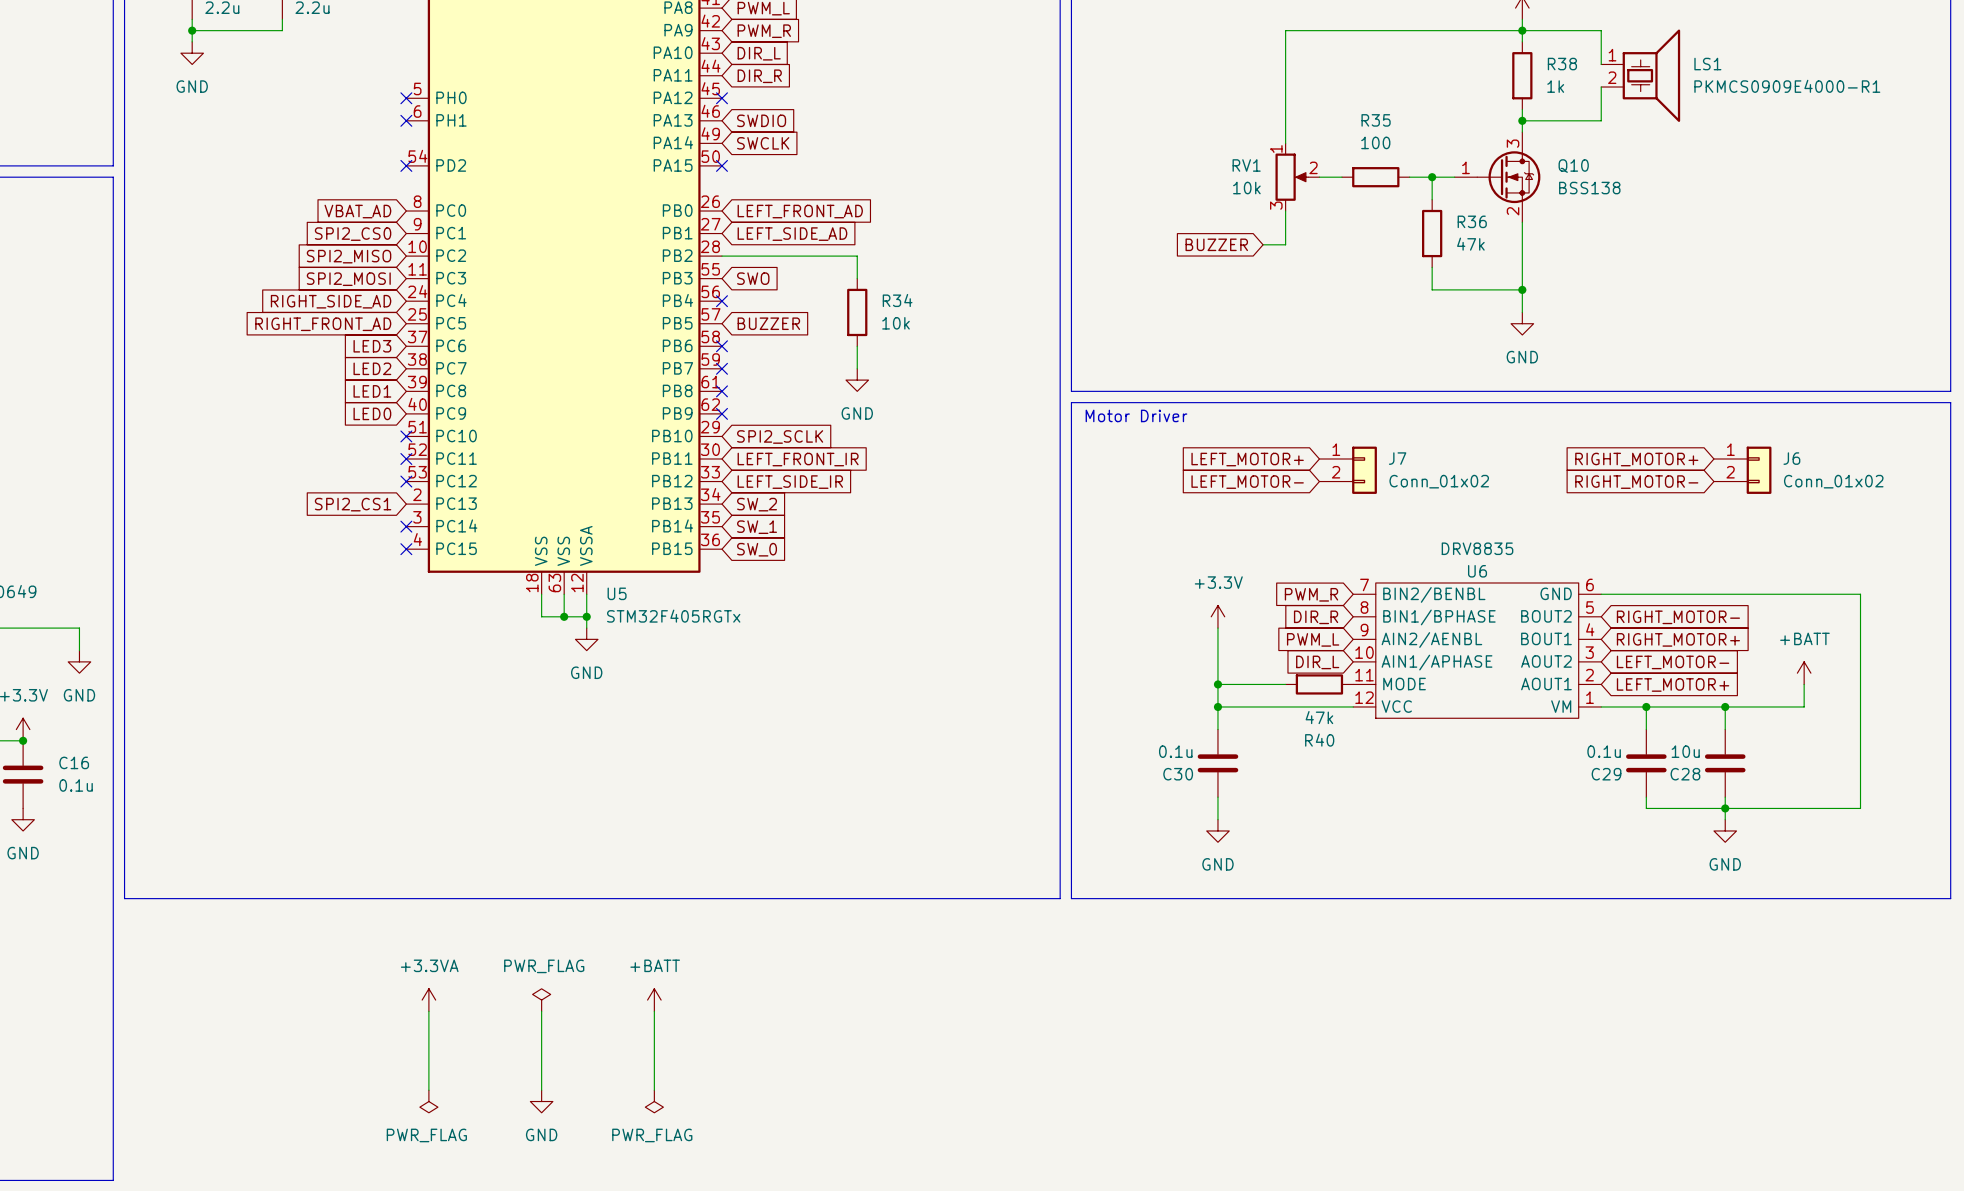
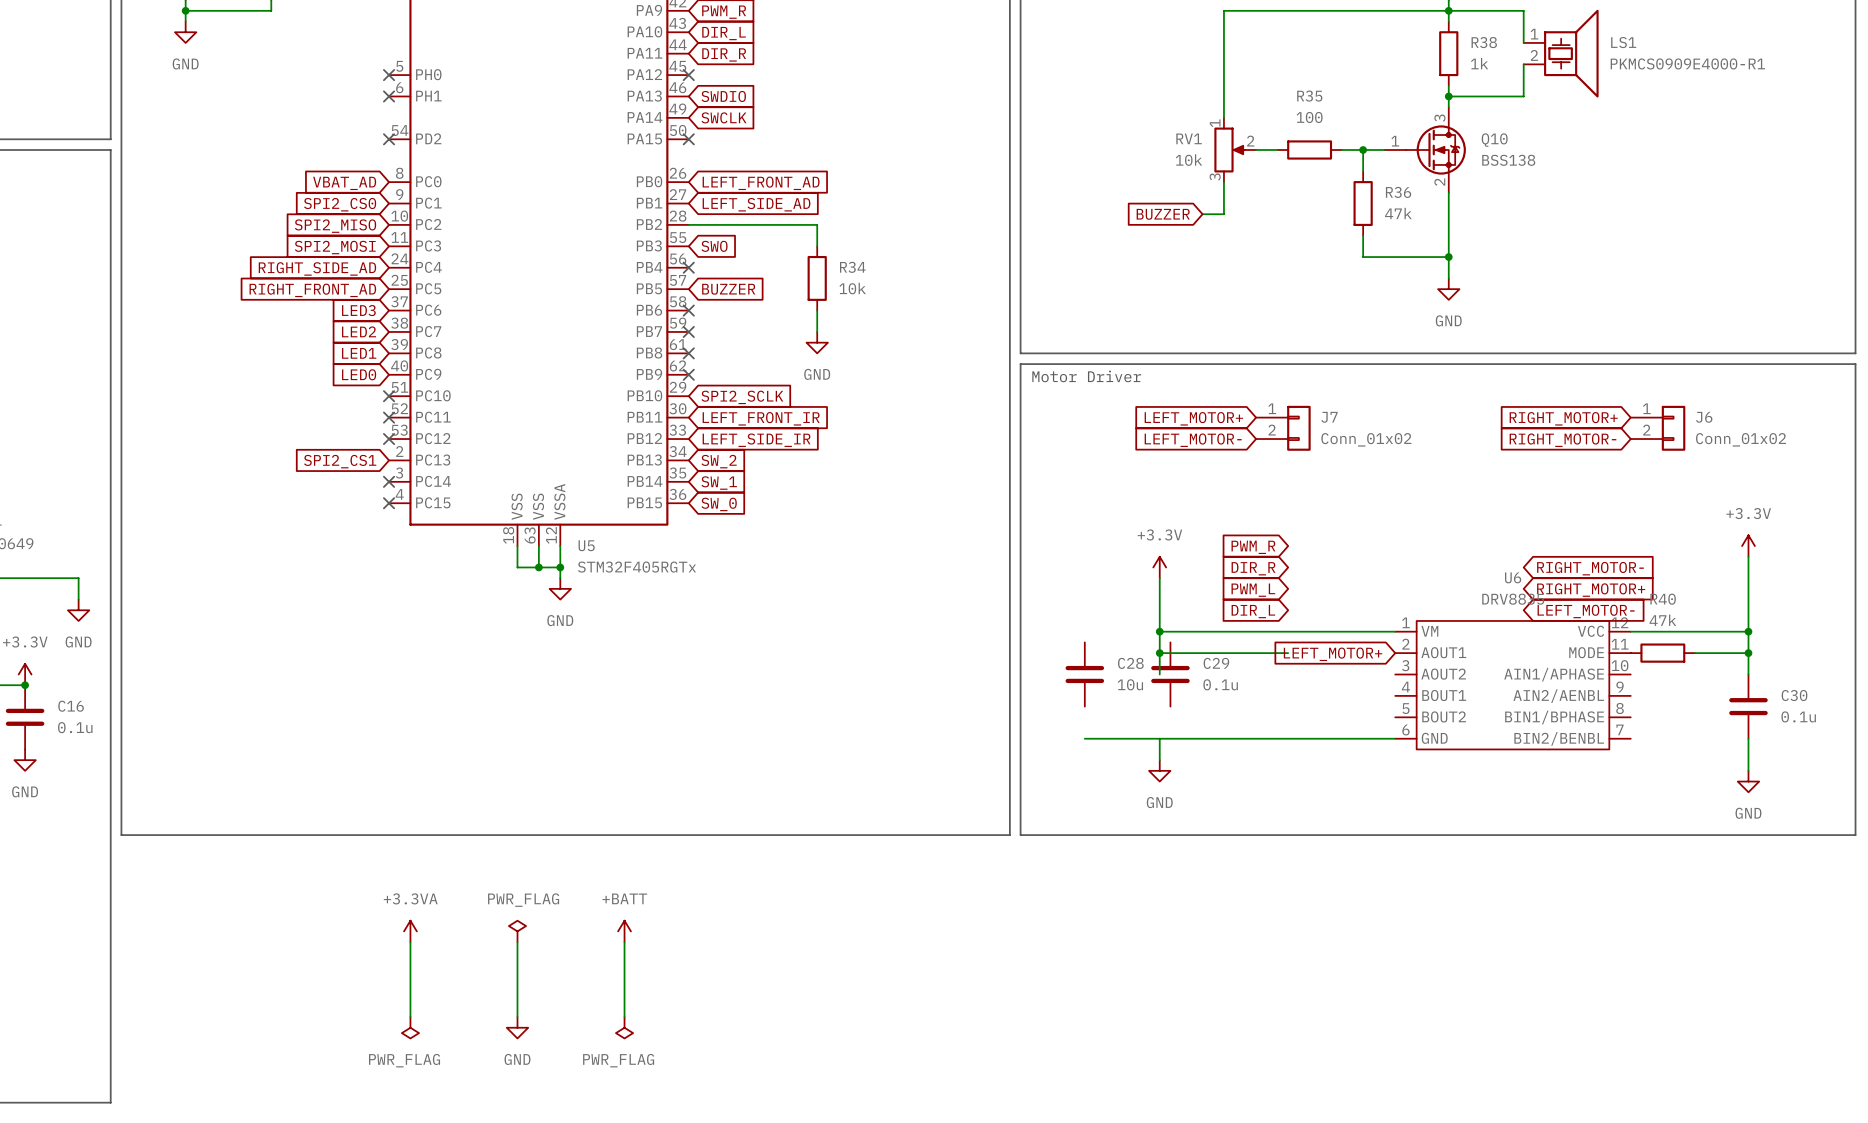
U6 name position: U6 (1477, 571) -> U6 (1513, 577)
wire: (1601, 594) (1860, 594) (1860, 808) (1646, 808) (1646, 797) -> none
power symbol: none -> +3.3V (1748, 546)
wire: none -> (1748, 556) (1748, 674)
U6 rotation: 0° (1477, 650) -> 180° (1512, 685)
power symbol: +BATT (1804, 673) -> none
wire: none -> (1223, 631) (1395, 631)
R40 position: (1319, 684) -> (1662, 653)
global label rotation: 0° (1673, 684) -> 180° (1333, 654)
global label position: LEFT_MOTOR+ (1673, 684) -> LEFT_MOTOR+ (1333, 654)
wire: none -> (1630, 631) (1748, 631)
wire: (1804, 684) (1804, 706) -> (1748, 653) (1716, 653)
junction: none -> (1748, 631)
wire: (1601, 706) (1781, 706) -> none
wire: (1646, 706) (1646, 729) -> none
junction: (1646, 706) -> none
wire: (1725, 706) (1725, 729) -> none
junction: (1725, 706) -> none
junction: none -> (1748, 653)
R40 value position: 47k (1319, 717) -> 47k (1662, 620)
R40 name position: R40 (1319, 740) -> R40 (1663, 599)
C30 value position: 0.1u (1175, 751) -> 0.1u (1798, 716)
C29 value position: 0.1u (1604, 751) -> 0.1u (1220, 684)
C28 value position: 10u (1685, 751) -> 10u (1130, 684)
C30 position: (1217, 763) -> (1748, 706)
C29 position: (1646, 763) -> (1170, 674)
C28 position: (1725, 763) -> (1084, 674)
C30 name position: C30 (1178, 774) -> C30 (1794, 695)
C29 name position: C29 (1606, 774) -> C29 (1216, 663)
C28 name position: C28 (1685, 774) -> C28 (1130, 663)
wire: none -> (1084, 738) (1395, 738)
wire: (1725, 797) (1725, 819) -> none
wire: none -> (1748, 738) (1748, 770)
junction: (1725, 808) -> none
power symbol position: GND (1725, 830) -> GND (1748, 781)

